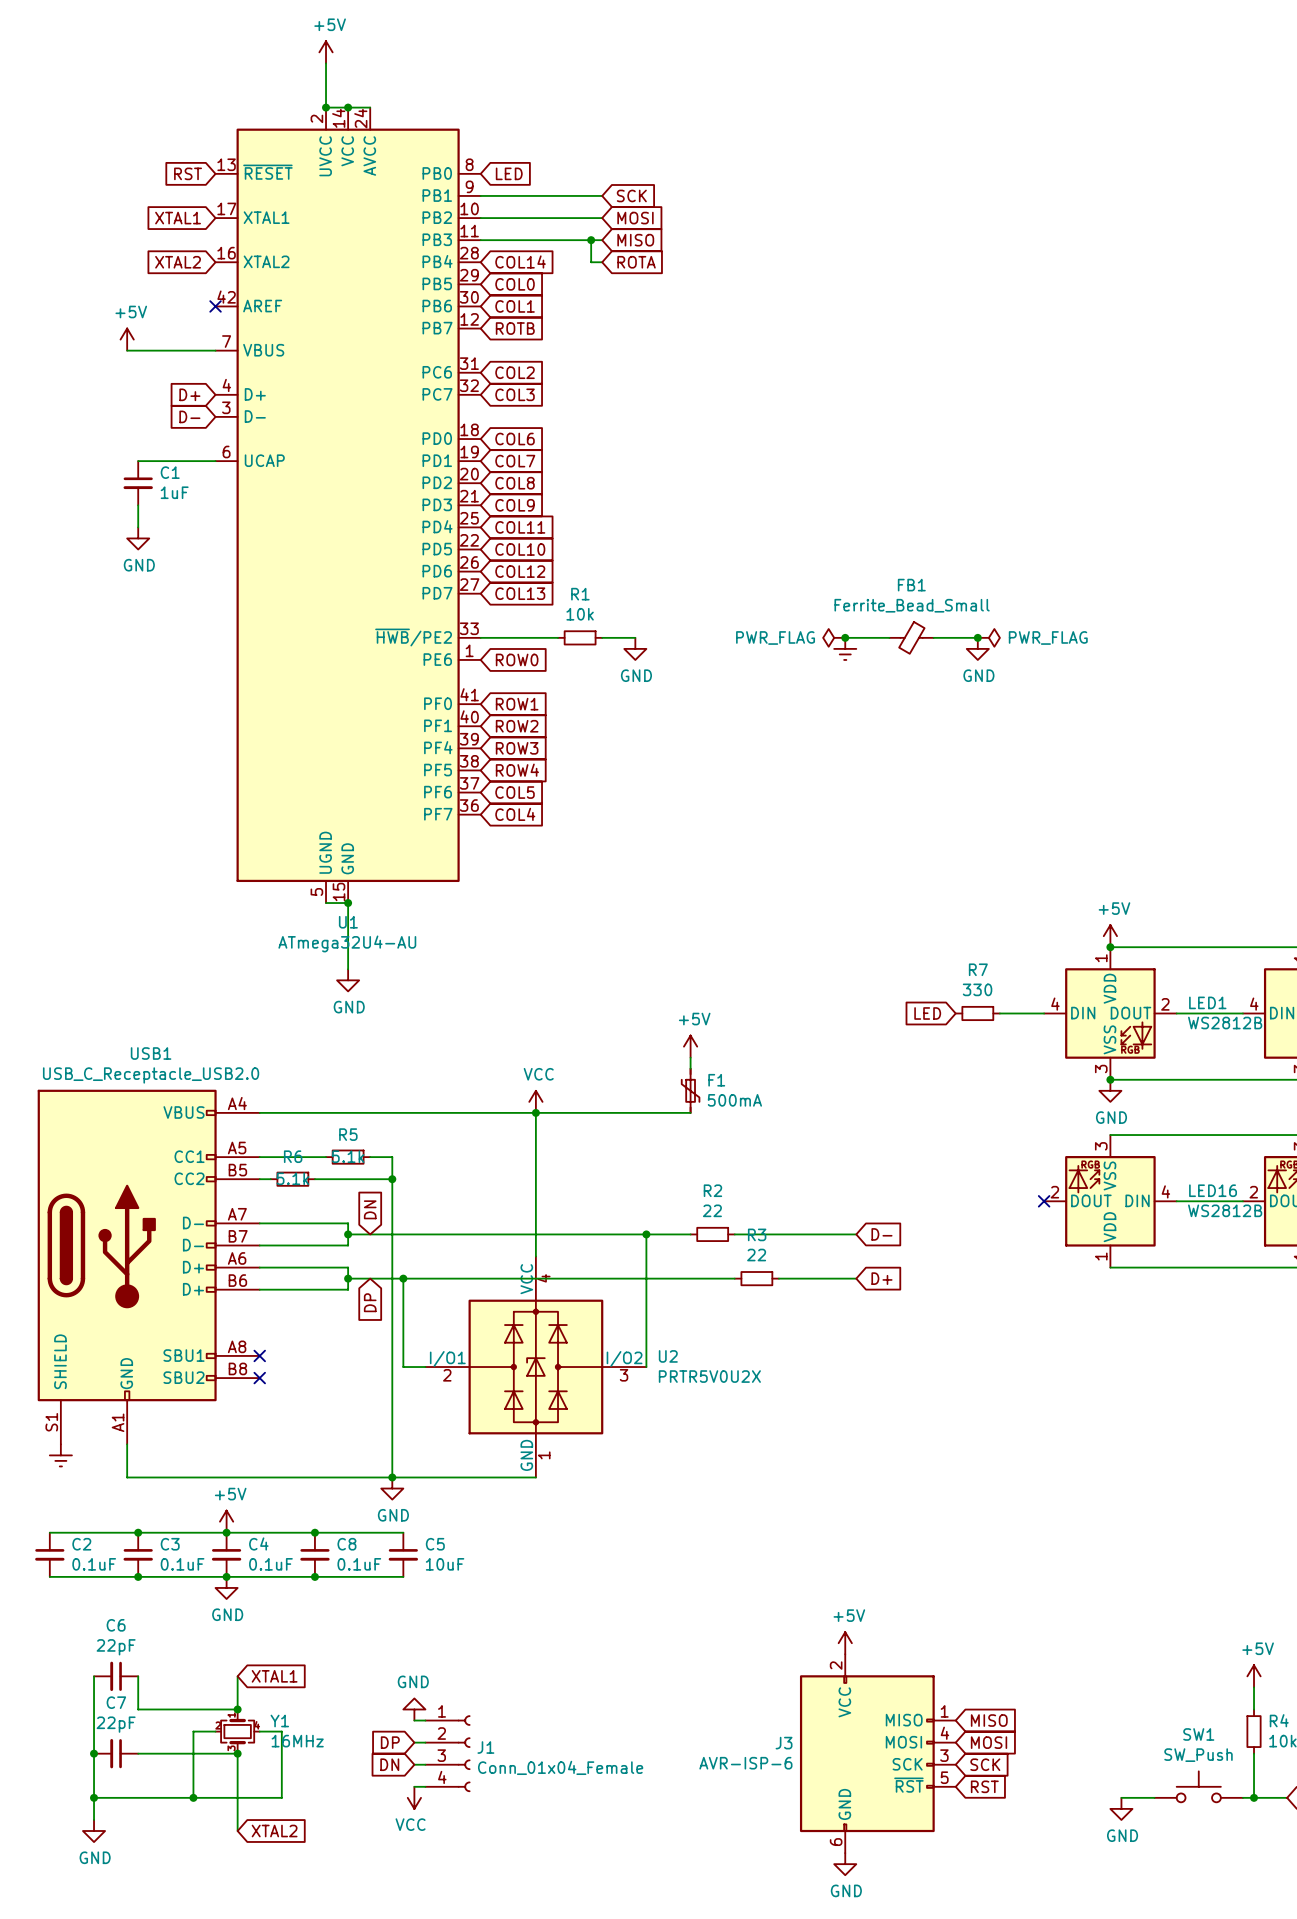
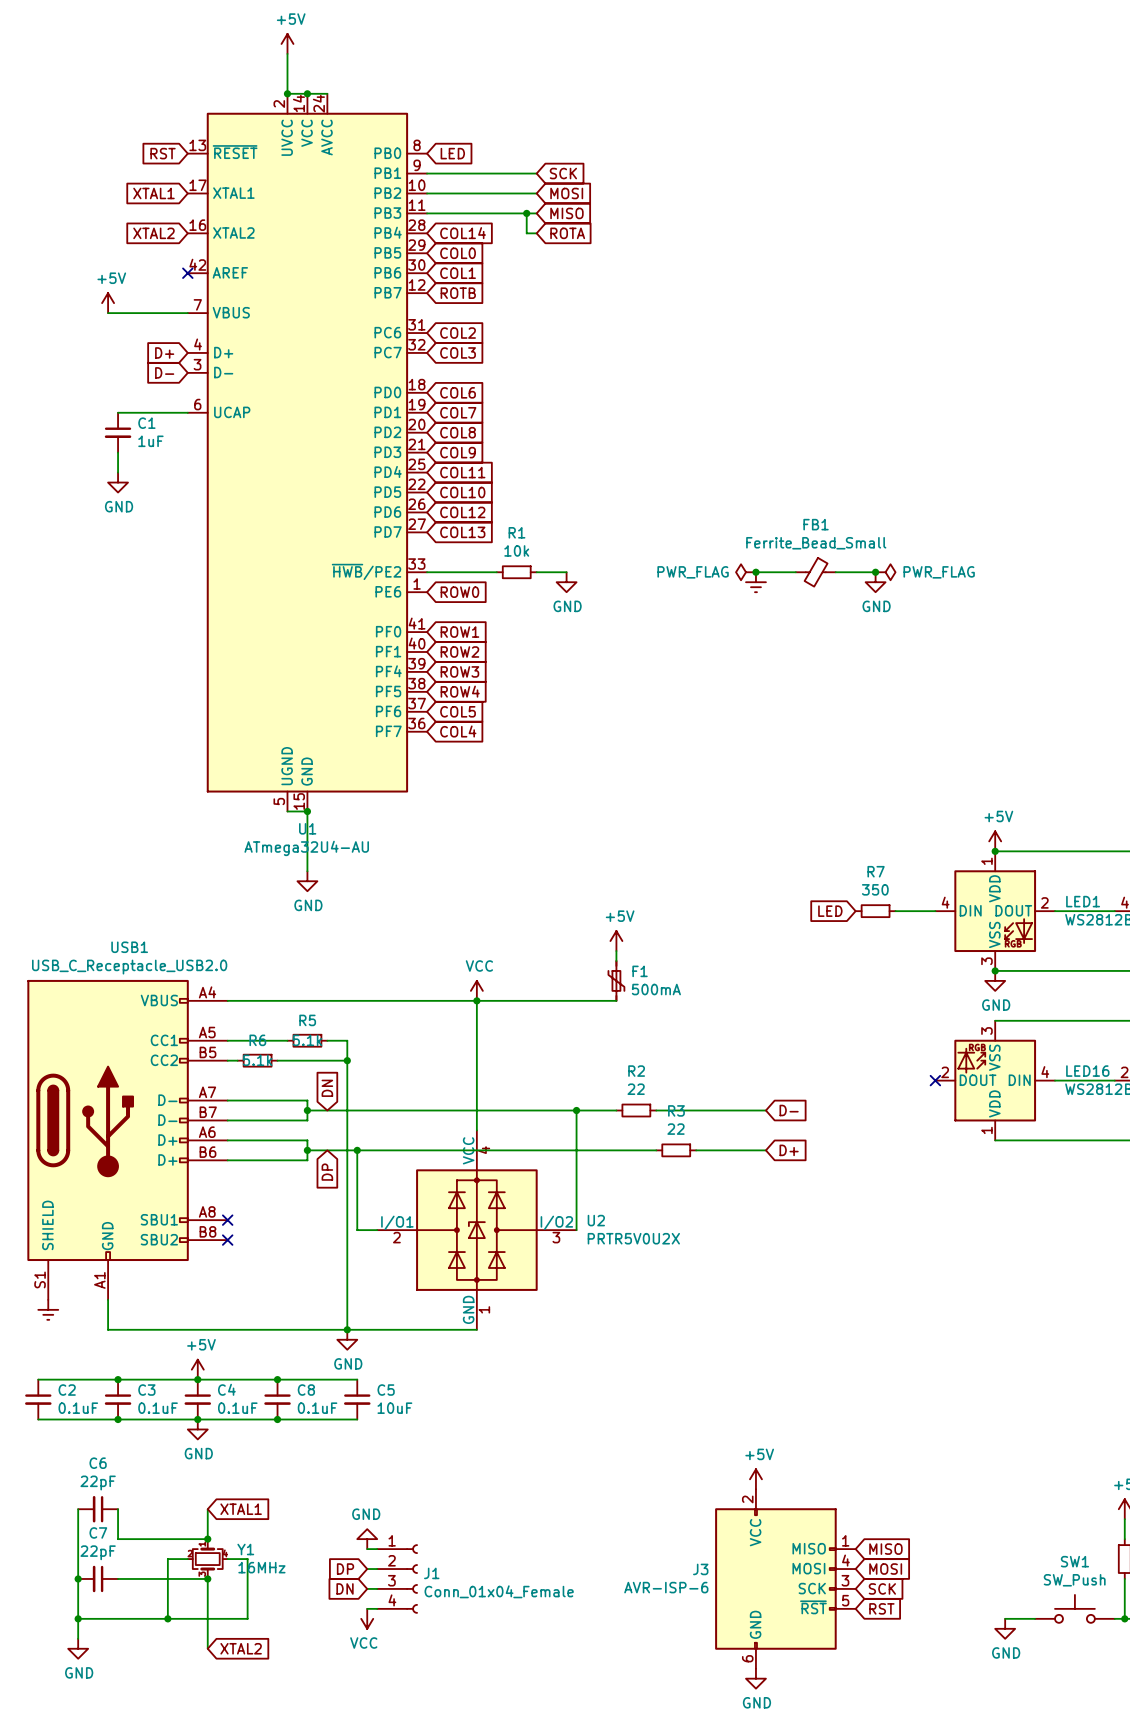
R7 value: 330 (977, 989) -> 350 (875, 889)

